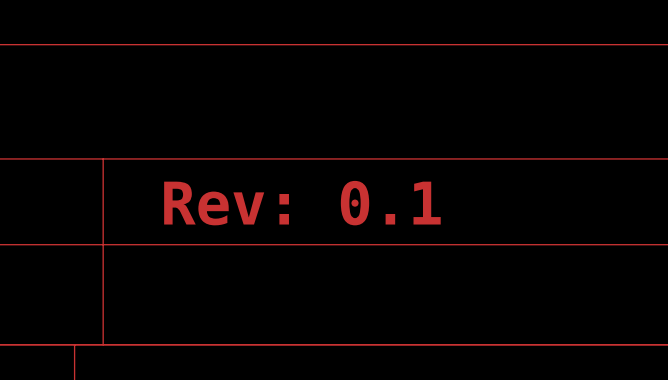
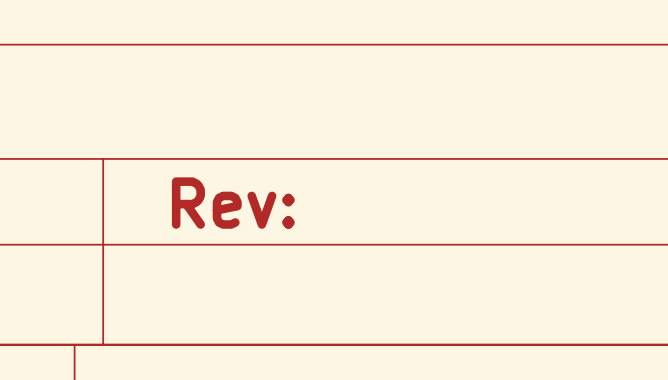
title block: Rev: 0.1 (302, 203) -> Rev: (233, 203)

